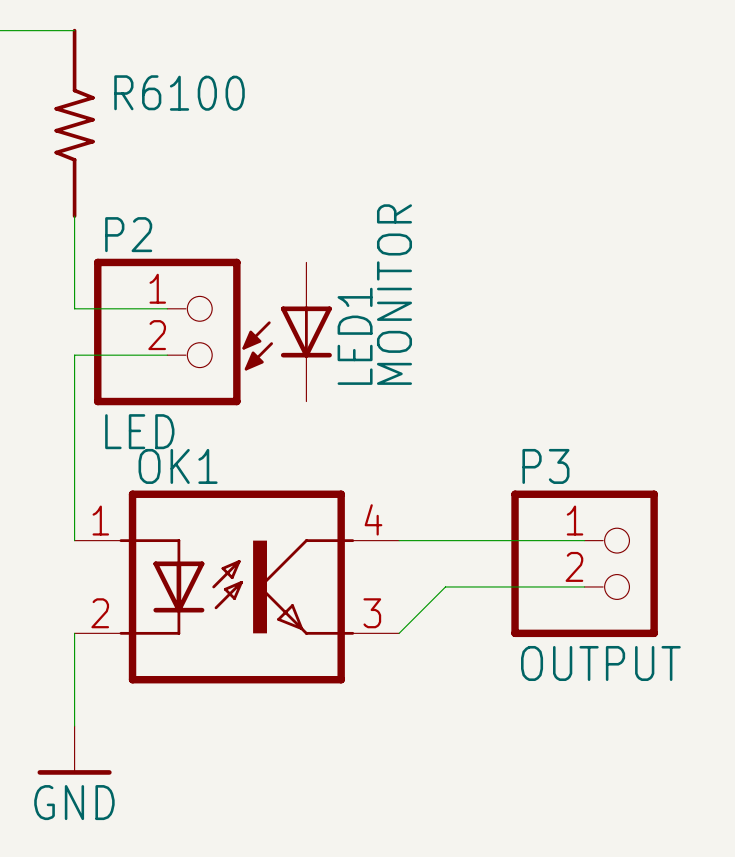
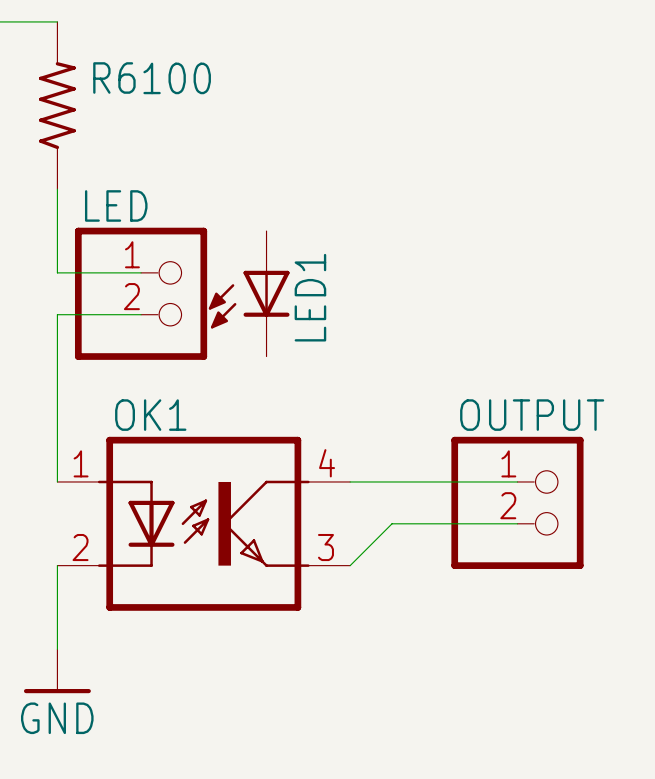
R6 symbol: [54, 28, 95, 218] -> [39, 21, 76, 190]
P2 name: P2 (128, 234) -> LED (116, 205)
LED1 value: MONITOR (394, 294) -> none
P2 value: LED (139, 431) -> none
P3 name: P3 (545, 466) -> OUTPUT (532, 415)
P3 value: OUTPUT (600, 663) -> none

